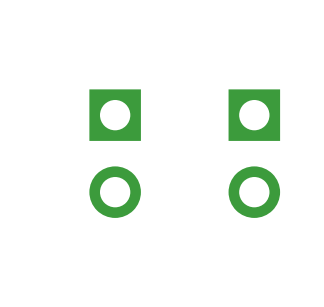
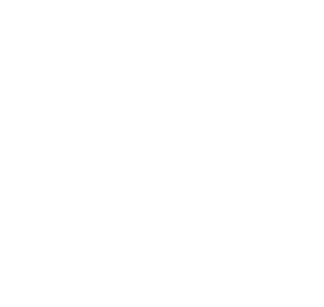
part: (115, 153) -> none
part: (254, 153) -> none

